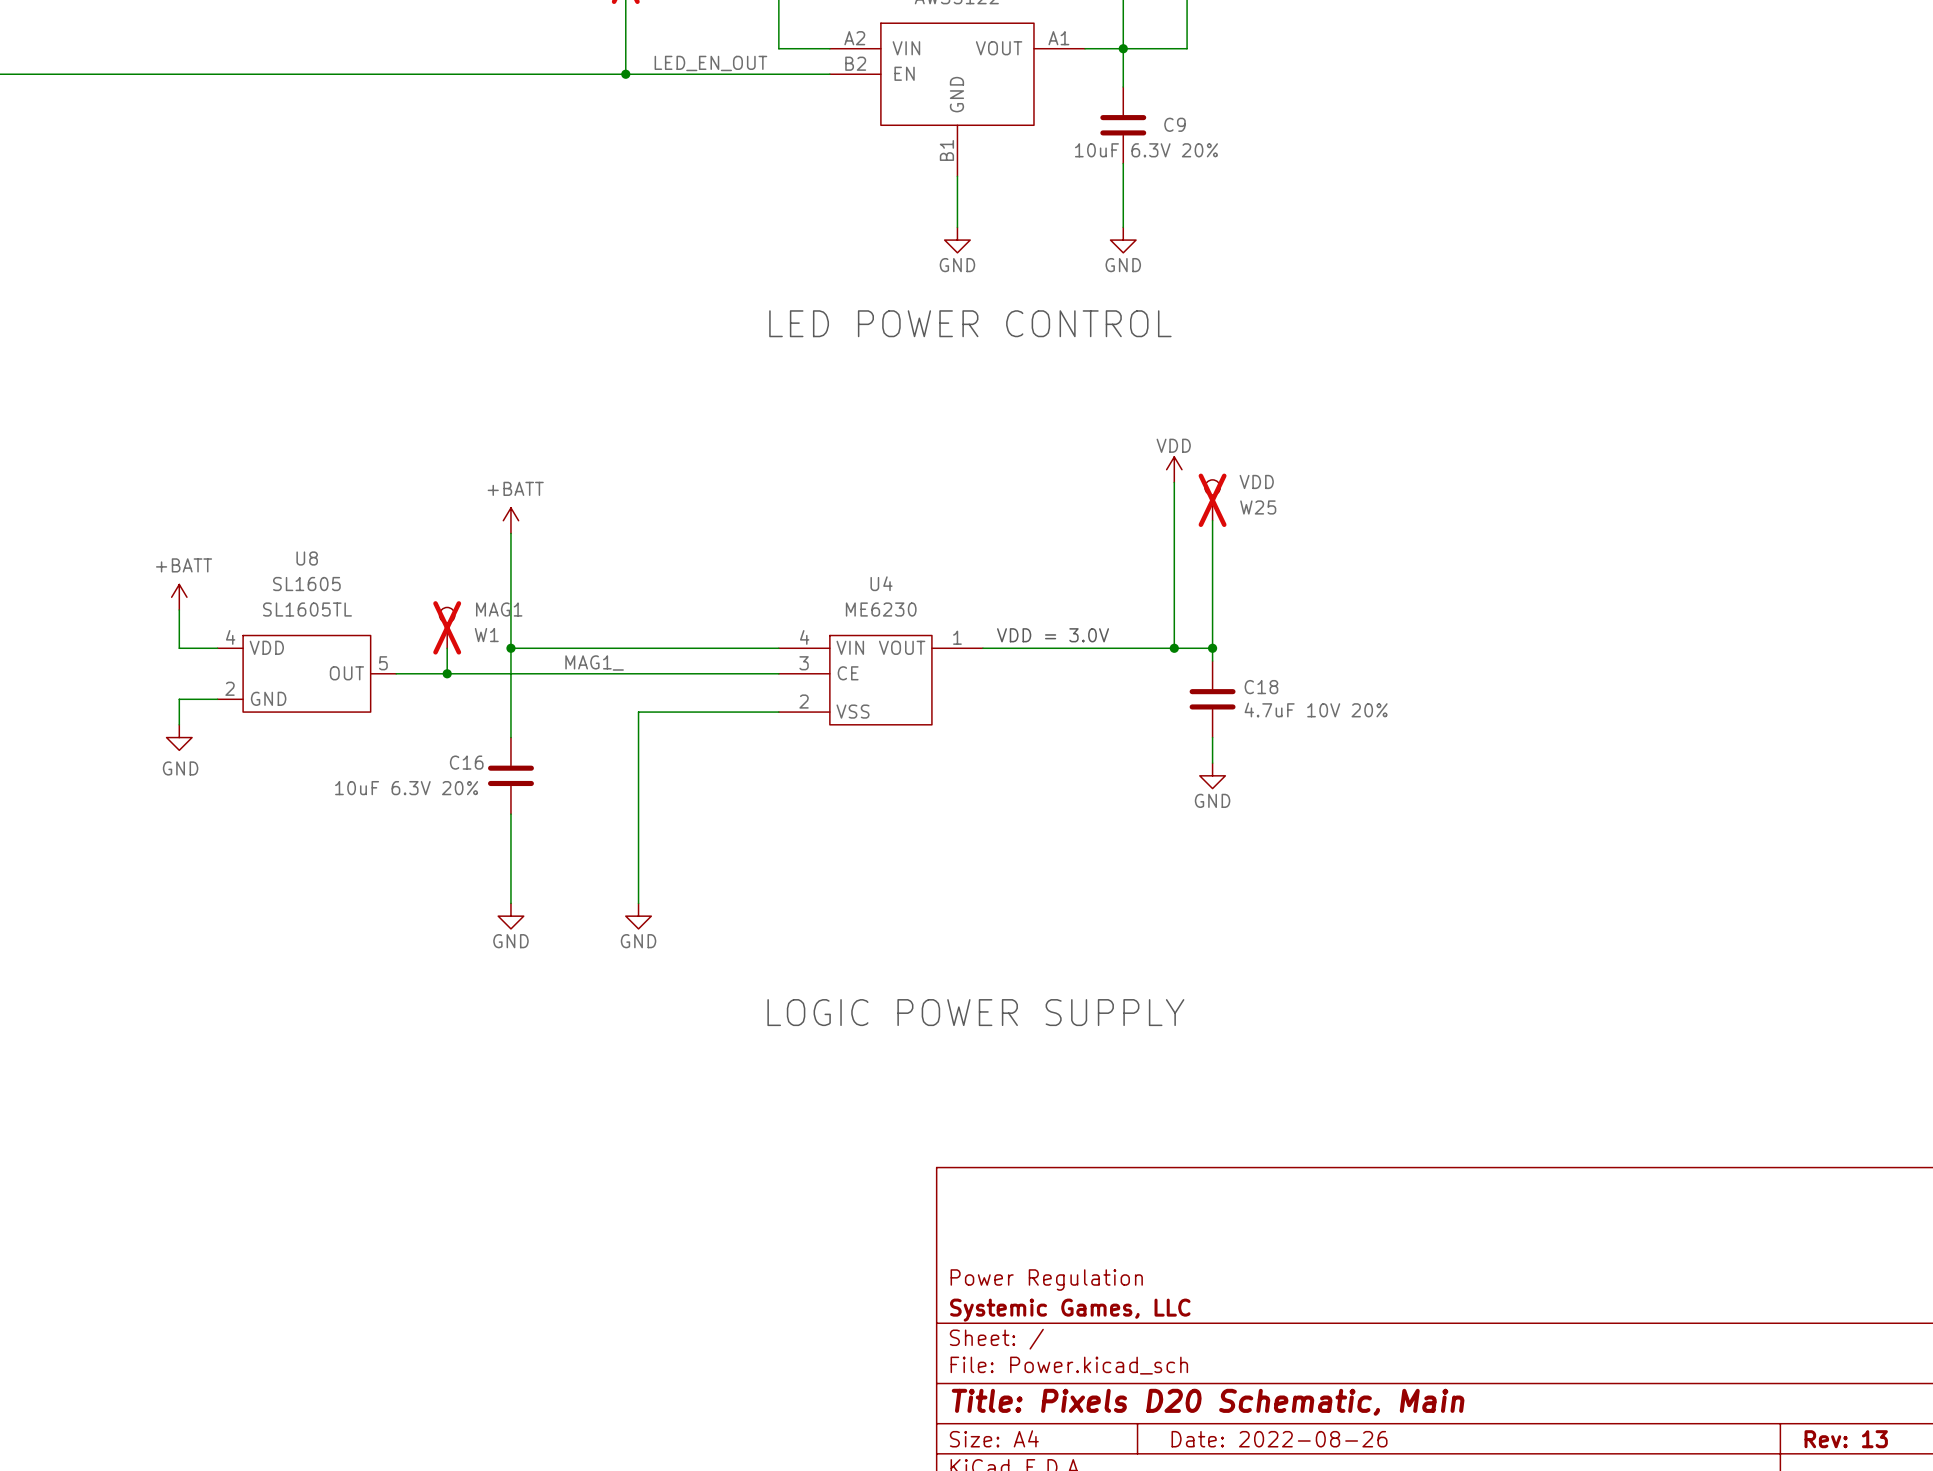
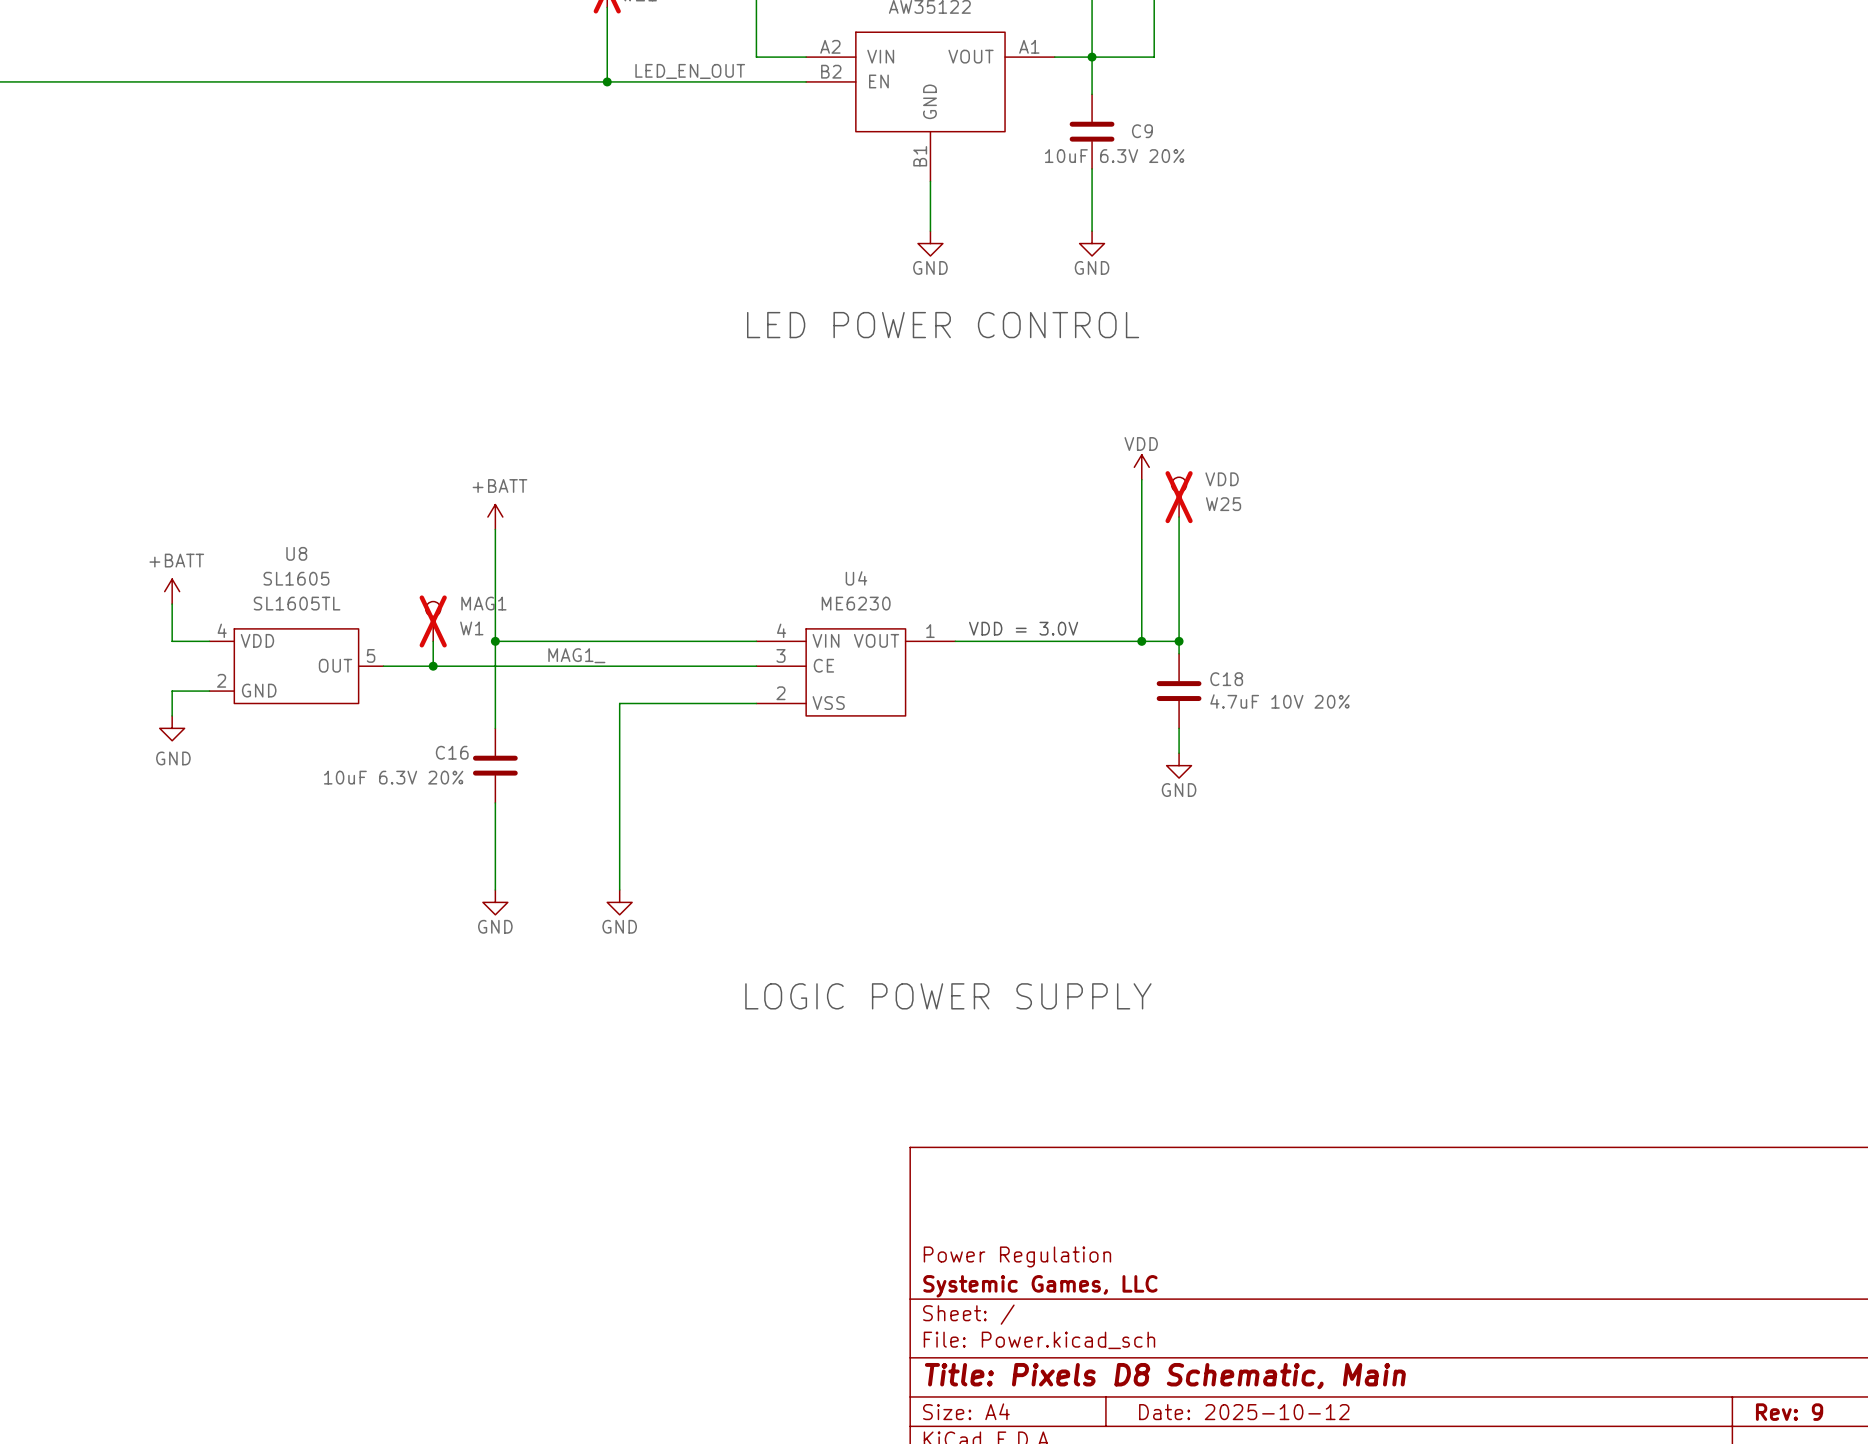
title block: Title: Pixels D20 Schematic, Main (1208, 1402) -> Title: Pixels D8 Schematic, Main (1165, 1376)
title block: Date: 2022-08-26 (1279, 1439) -> Date: 2025-10-12 (1244, 1412)
title block: Rev: 13 (1846, 1439) -> Rev: 9 (1789, 1412)

